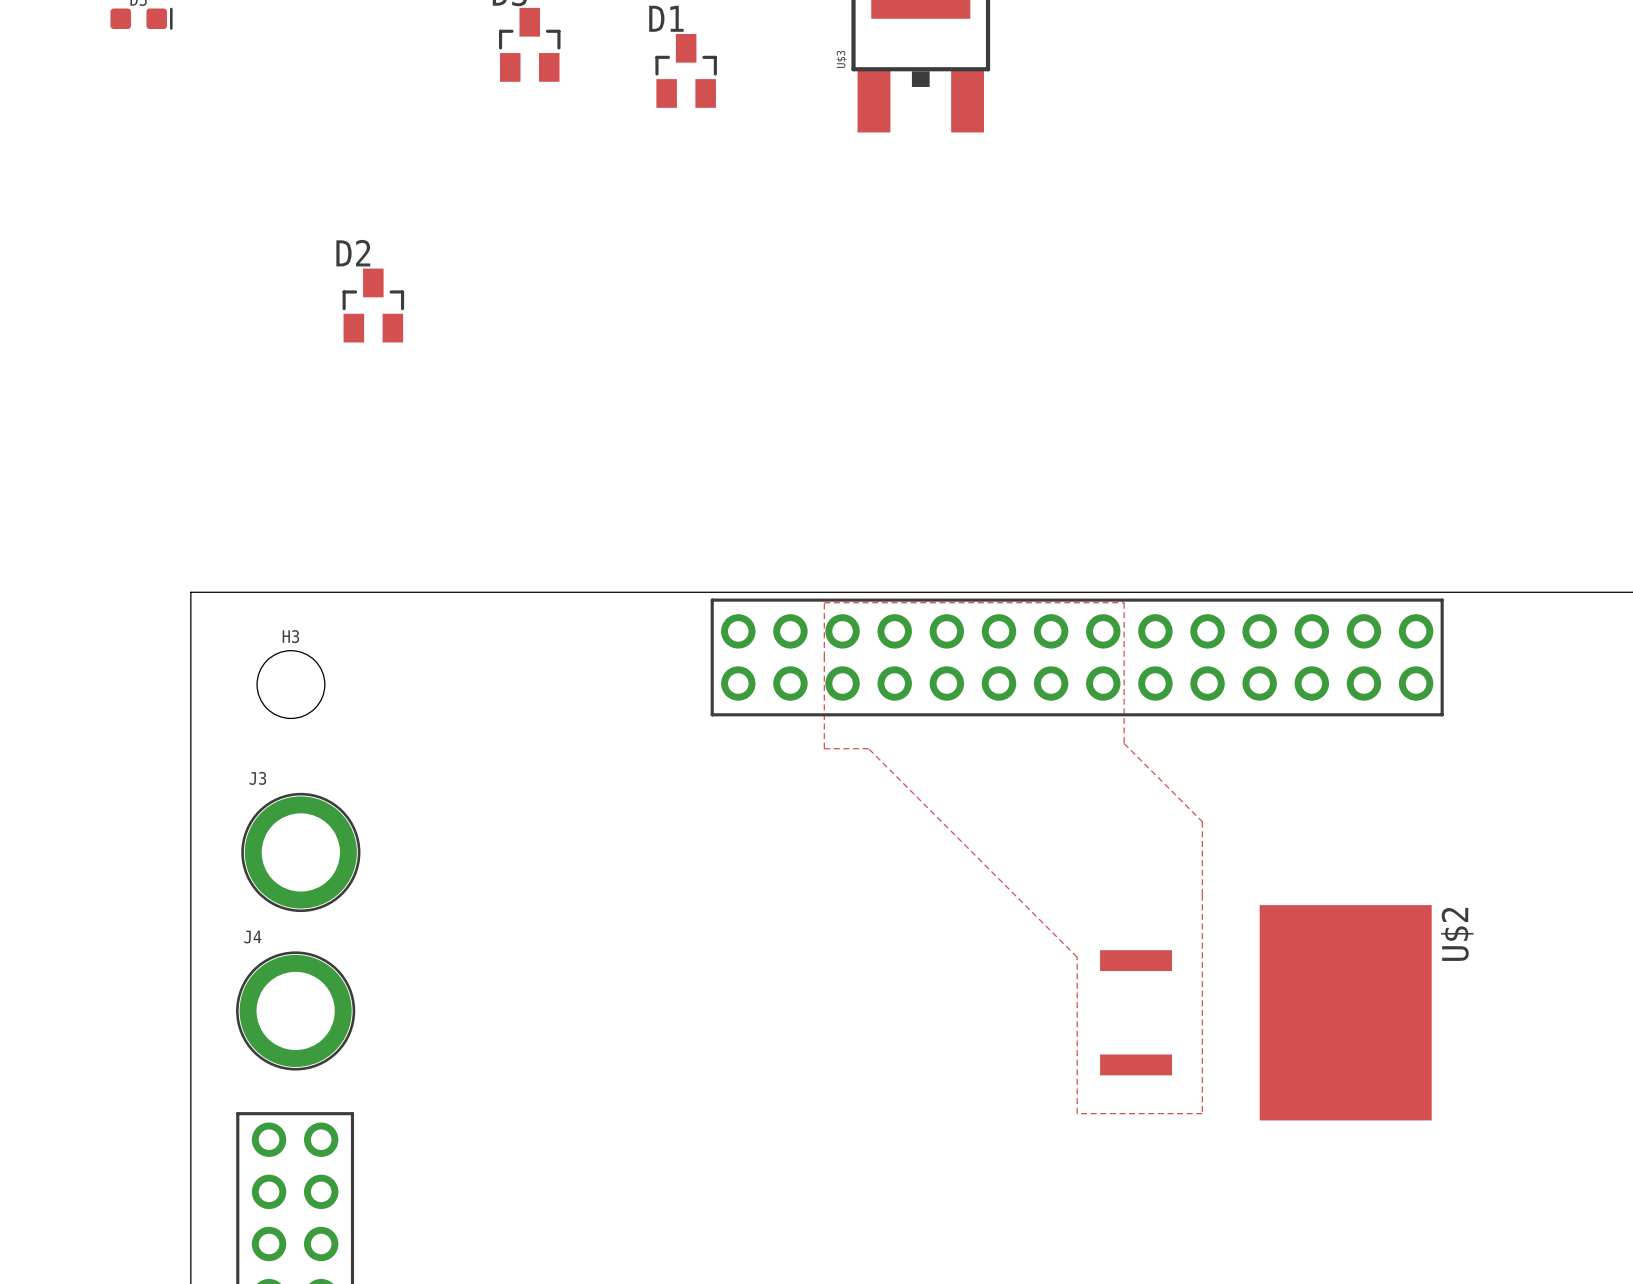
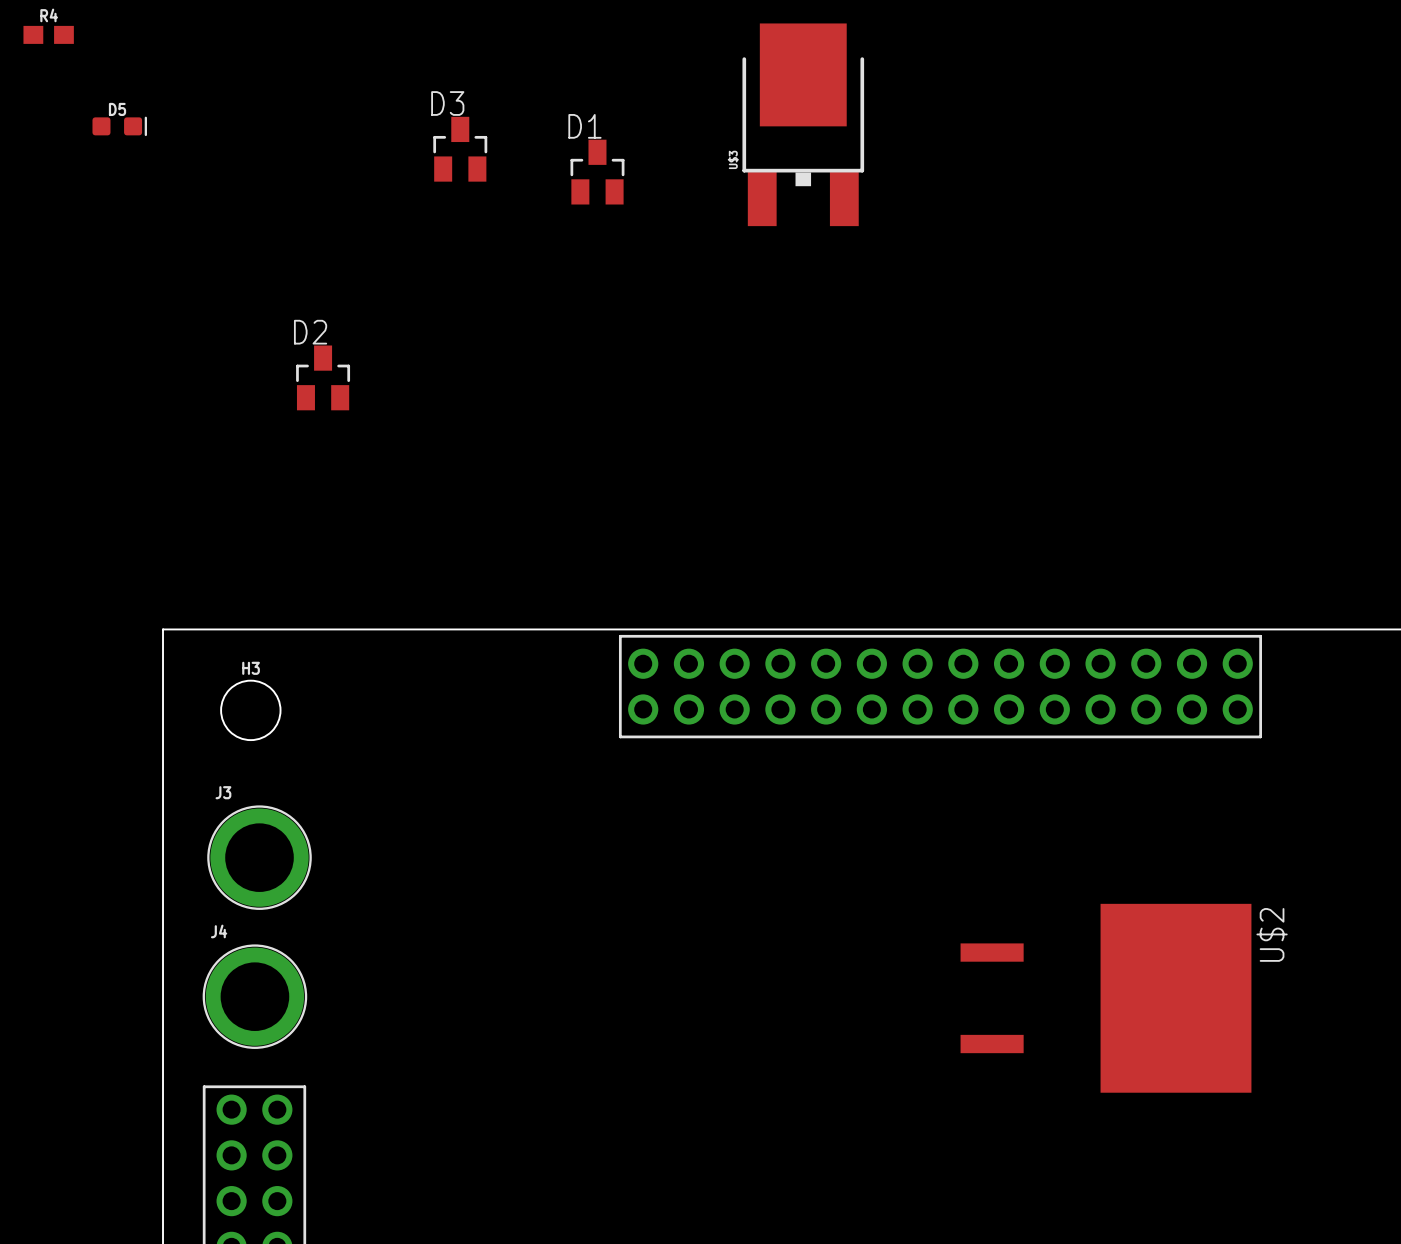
zone outline: (824, 602) (824, 748) (868, 748) (1077, 957) (1077, 1113) (1202, 1113) (1202, 821) (1124, 743) (1124, 602) (824, 602) -> none

